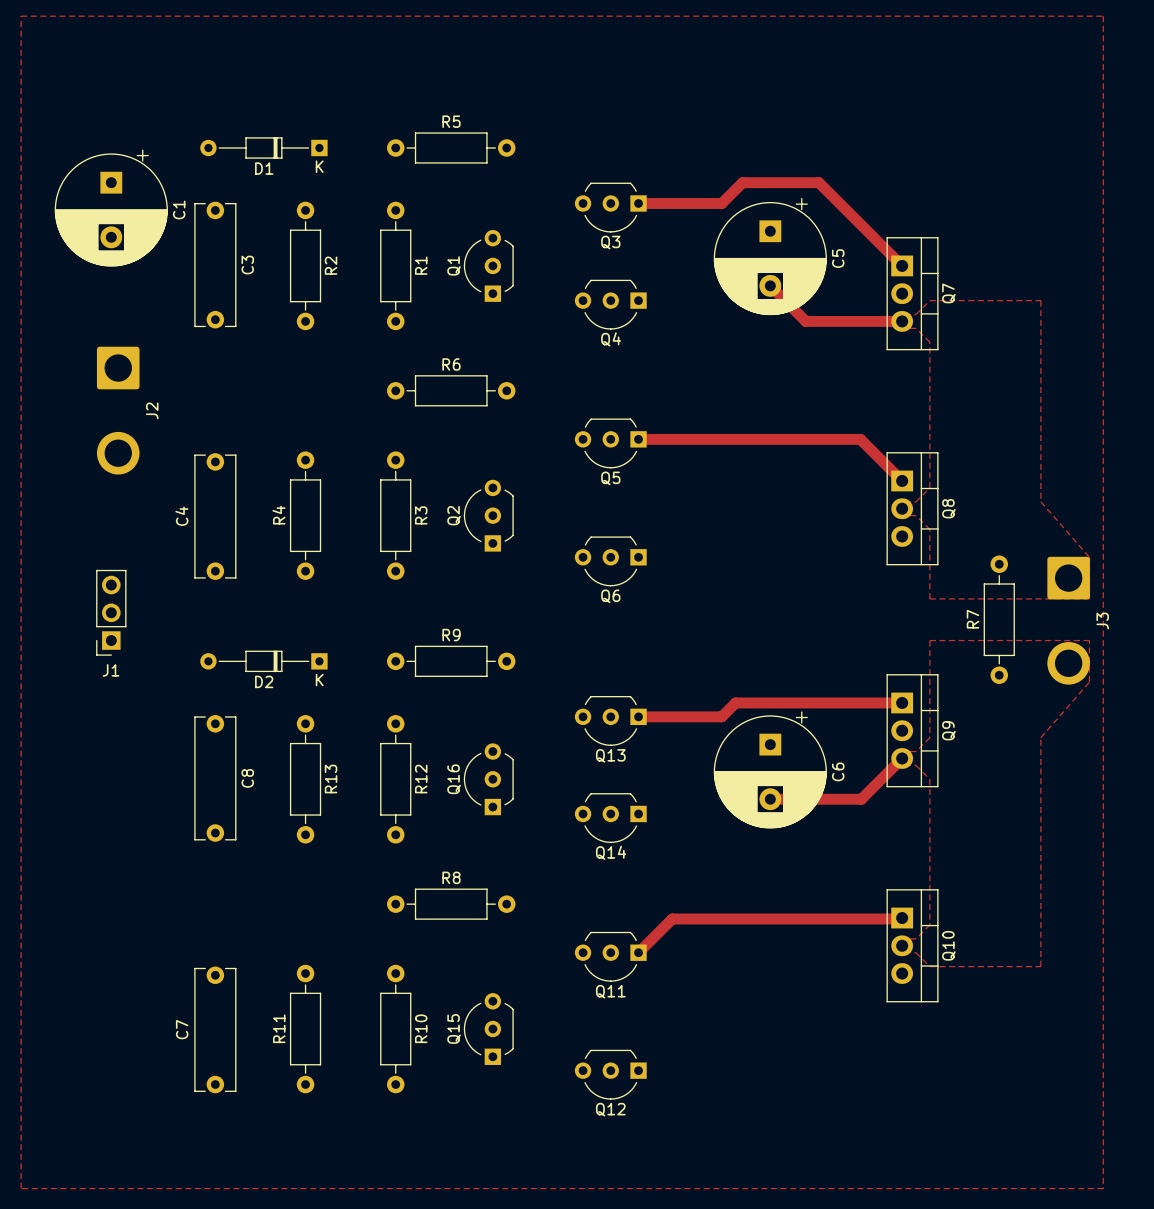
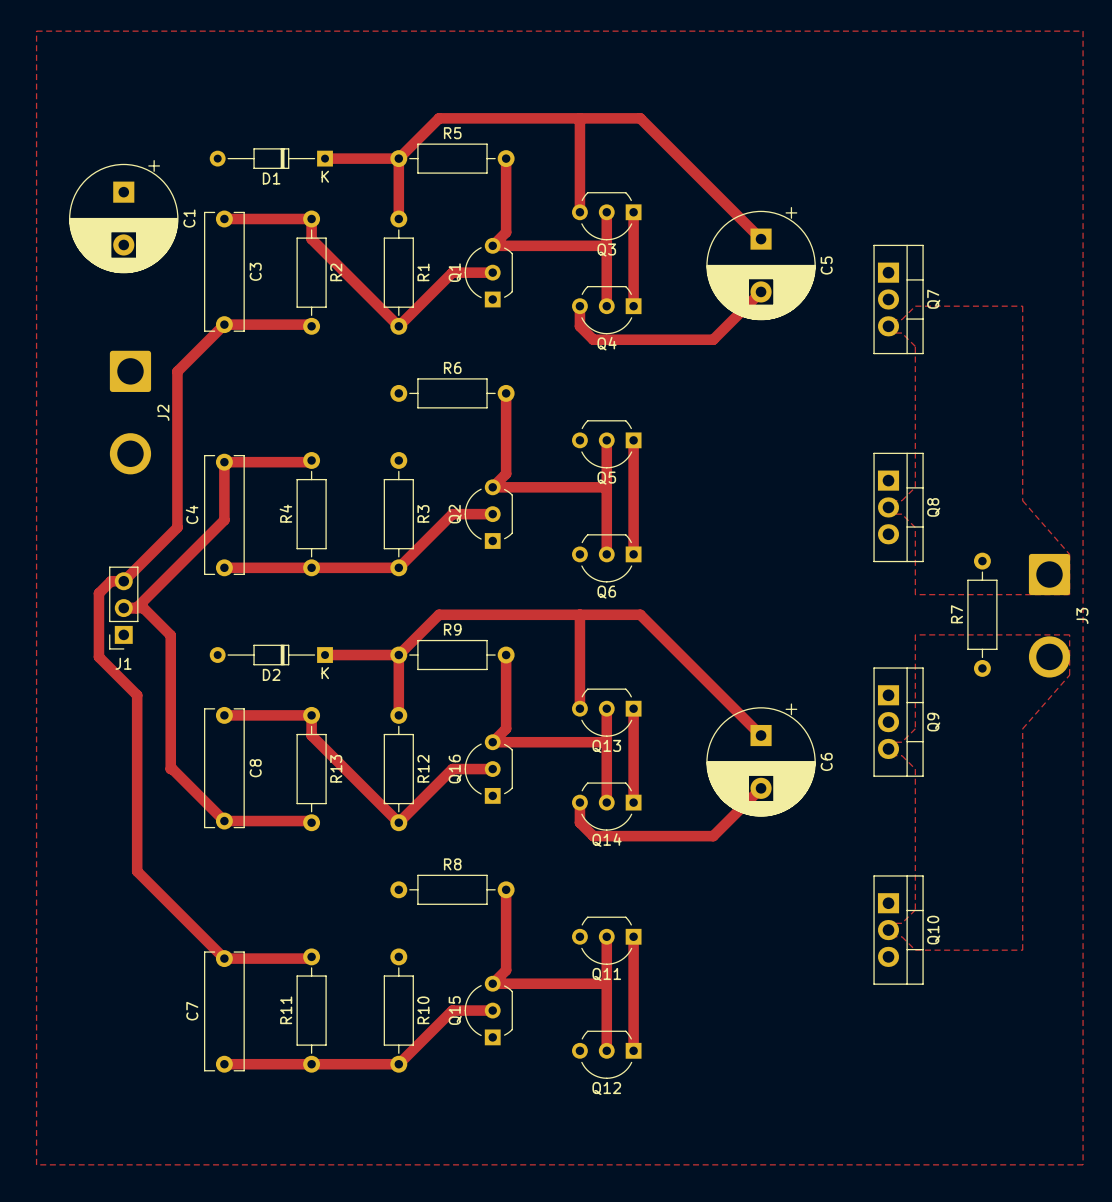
track: none -> (579, 118) (579, 212)
track: none -> (325, 158) (398, 158)
track: none -> (398, 158) (398, 218)
track: none -> (398, 158) (439, 118) (640, 118) (761, 239)
track: none -> (506, 158) (506, 232) (492, 245) (606, 245)
track: none -> (606, 212) (606, 306)
track: (638, 203) (721, 203) (742, 182) (818, 182) (902, 265) -> (633, 212) (633, 306)
track: none -> (224, 218) (311, 218) (311, 239) (398, 326) (452, 272) (492, 272)
track: (770, 285) (805, 321) (902, 321) -> (761, 291) (713, 339) (593, 339) (579, 326) (579, 306)
track: none -> (311, 326) (309, 324) (224, 324) (177, 371) (177, 527) (123, 581) (111, 581) (98, 593) (98, 657) (137, 695) (137, 871) (224, 958) (309, 958) (311, 956)
track: none -> (506, 393) (506, 473) (492, 487) (606, 487)
track: none -> (606, 440) (606, 554)
track: (638, 439) (860, 439) (902, 480) -> (633, 440) (633, 554)
track: none -> (311, 460) (309, 462) (224, 462) (224, 520) (136, 608)
track: none -> (492, 514) (452, 514) (398, 567) (224, 567)
track: none -> (123, 608) (143, 608) (170, 635) (170, 769) (224, 821) (309, 821) (311, 822)
track: none -> (579, 614) (579, 708)
track: none -> (325, 655) (398, 655)
track: none -> (398, 655) (398, 715)
track: none -> (398, 655) (439, 614) (640, 614) (761, 735)
track: none -> (506, 655) (506, 728) (492, 742) (606, 742)
track: (902, 702) (735, 702) (721, 716) (638, 716) -> (633, 802) (633, 708)
track: none -> (606, 708) (606, 802)
track: none -> (224, 715) (311, 715) (311, 735) (398, 822) (452, 769) (492, 769)
track: (902, 758) (861, 799) (770, 799) -> (579, 802) (579, 822) (593, 836) (713, 836) (761, 788)
track: none -> (506, 889) (506, 970) (492, 983) (606, 983)
track: (901, 918) (672, 918) (638, 952) -> (633, 1050) (633, 936)
track: none -> (606, 936) (606, 983)
track: none -> (606, 983) (606, 1050)
track: none -> (492, 1010) (452, 1010) (398, 1064) (224, 1064)

